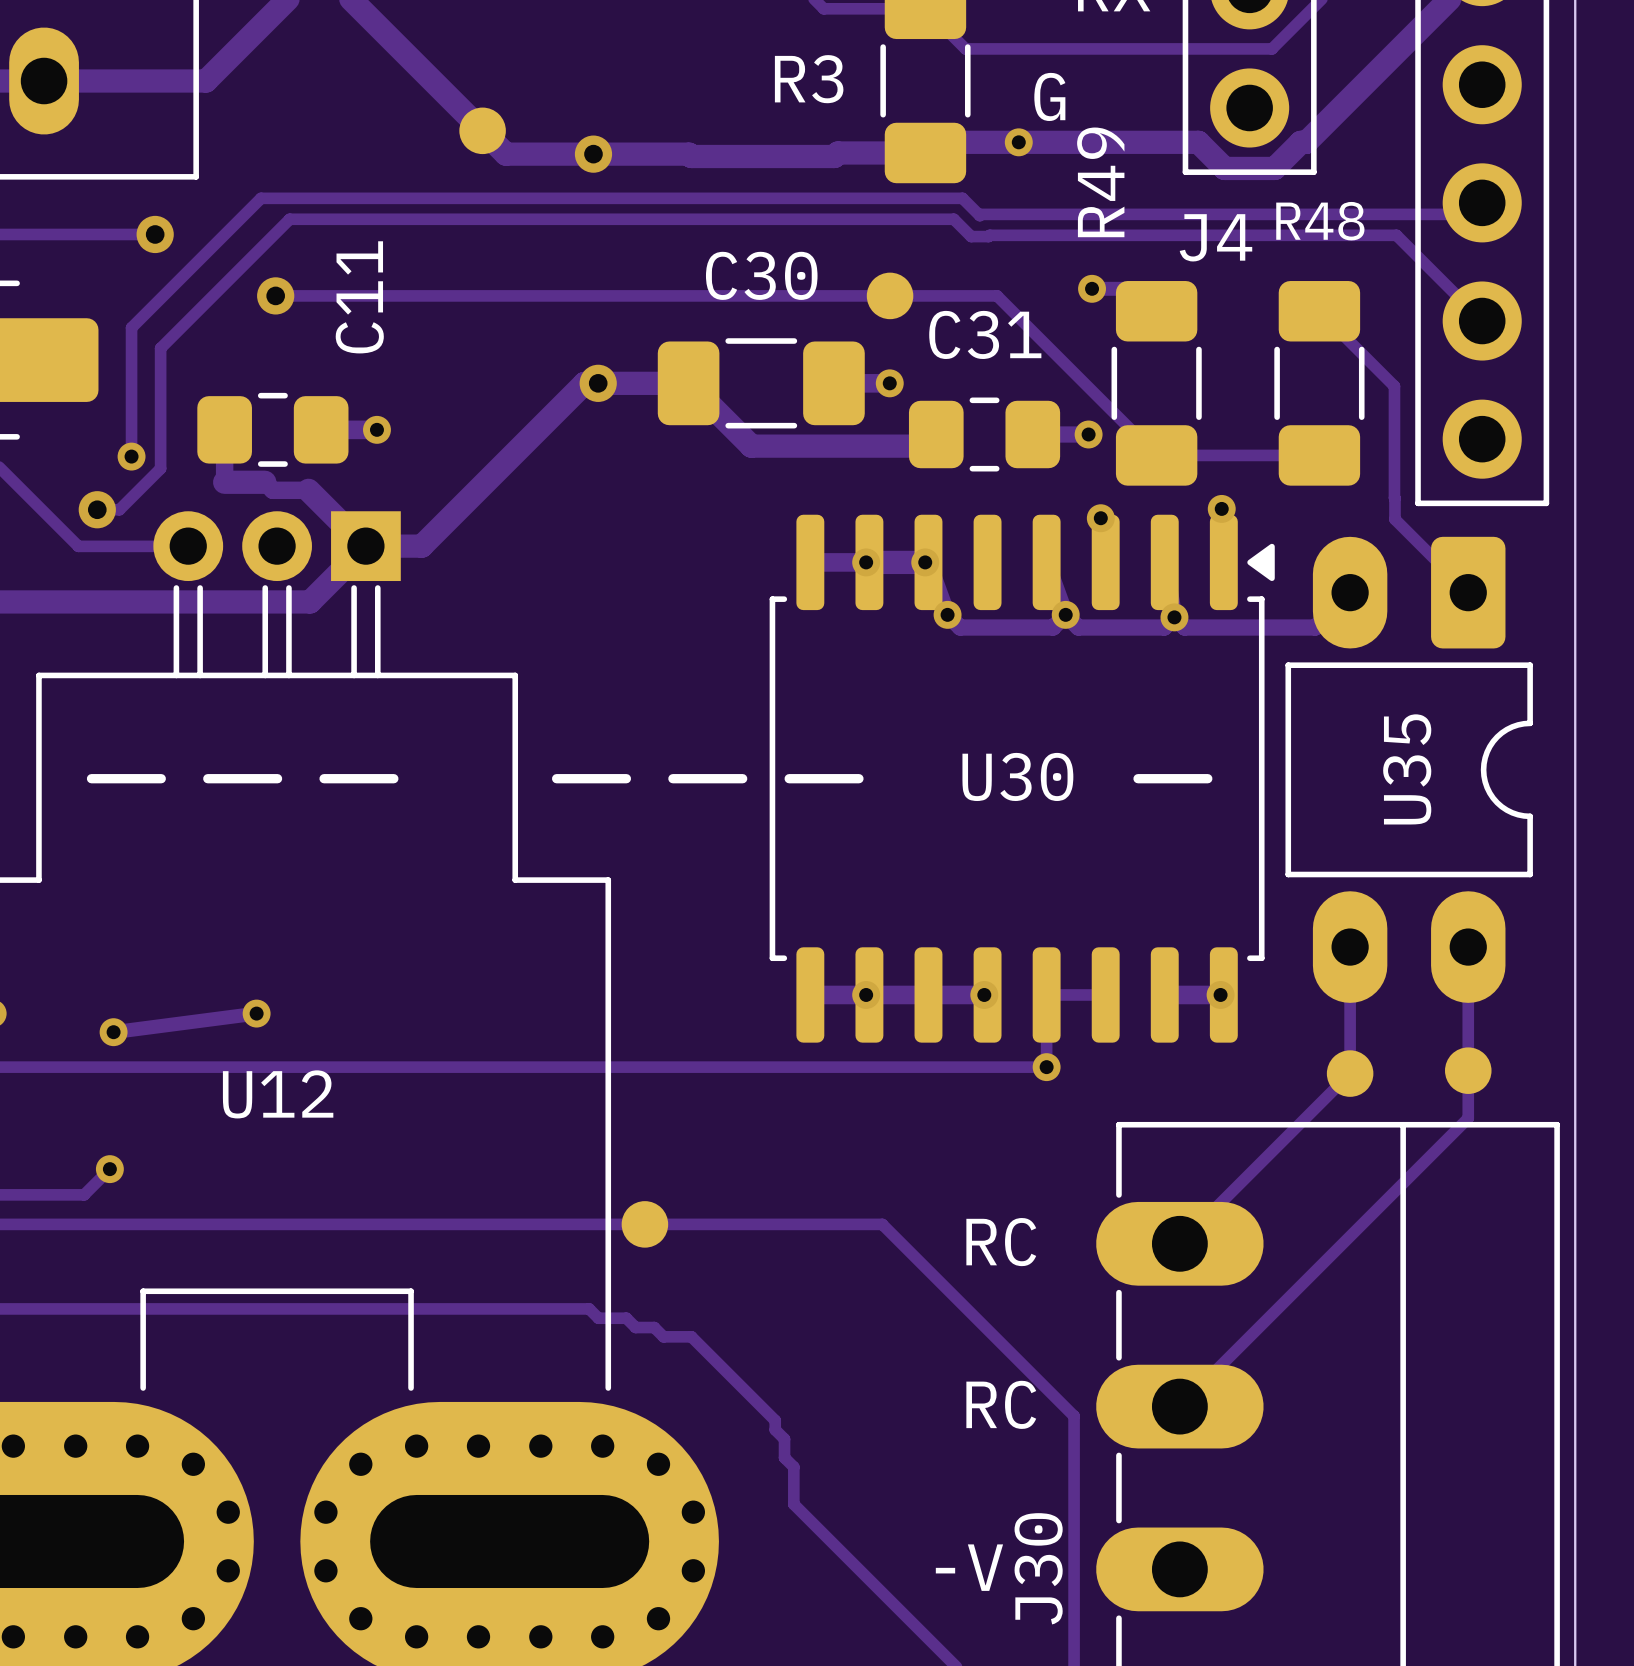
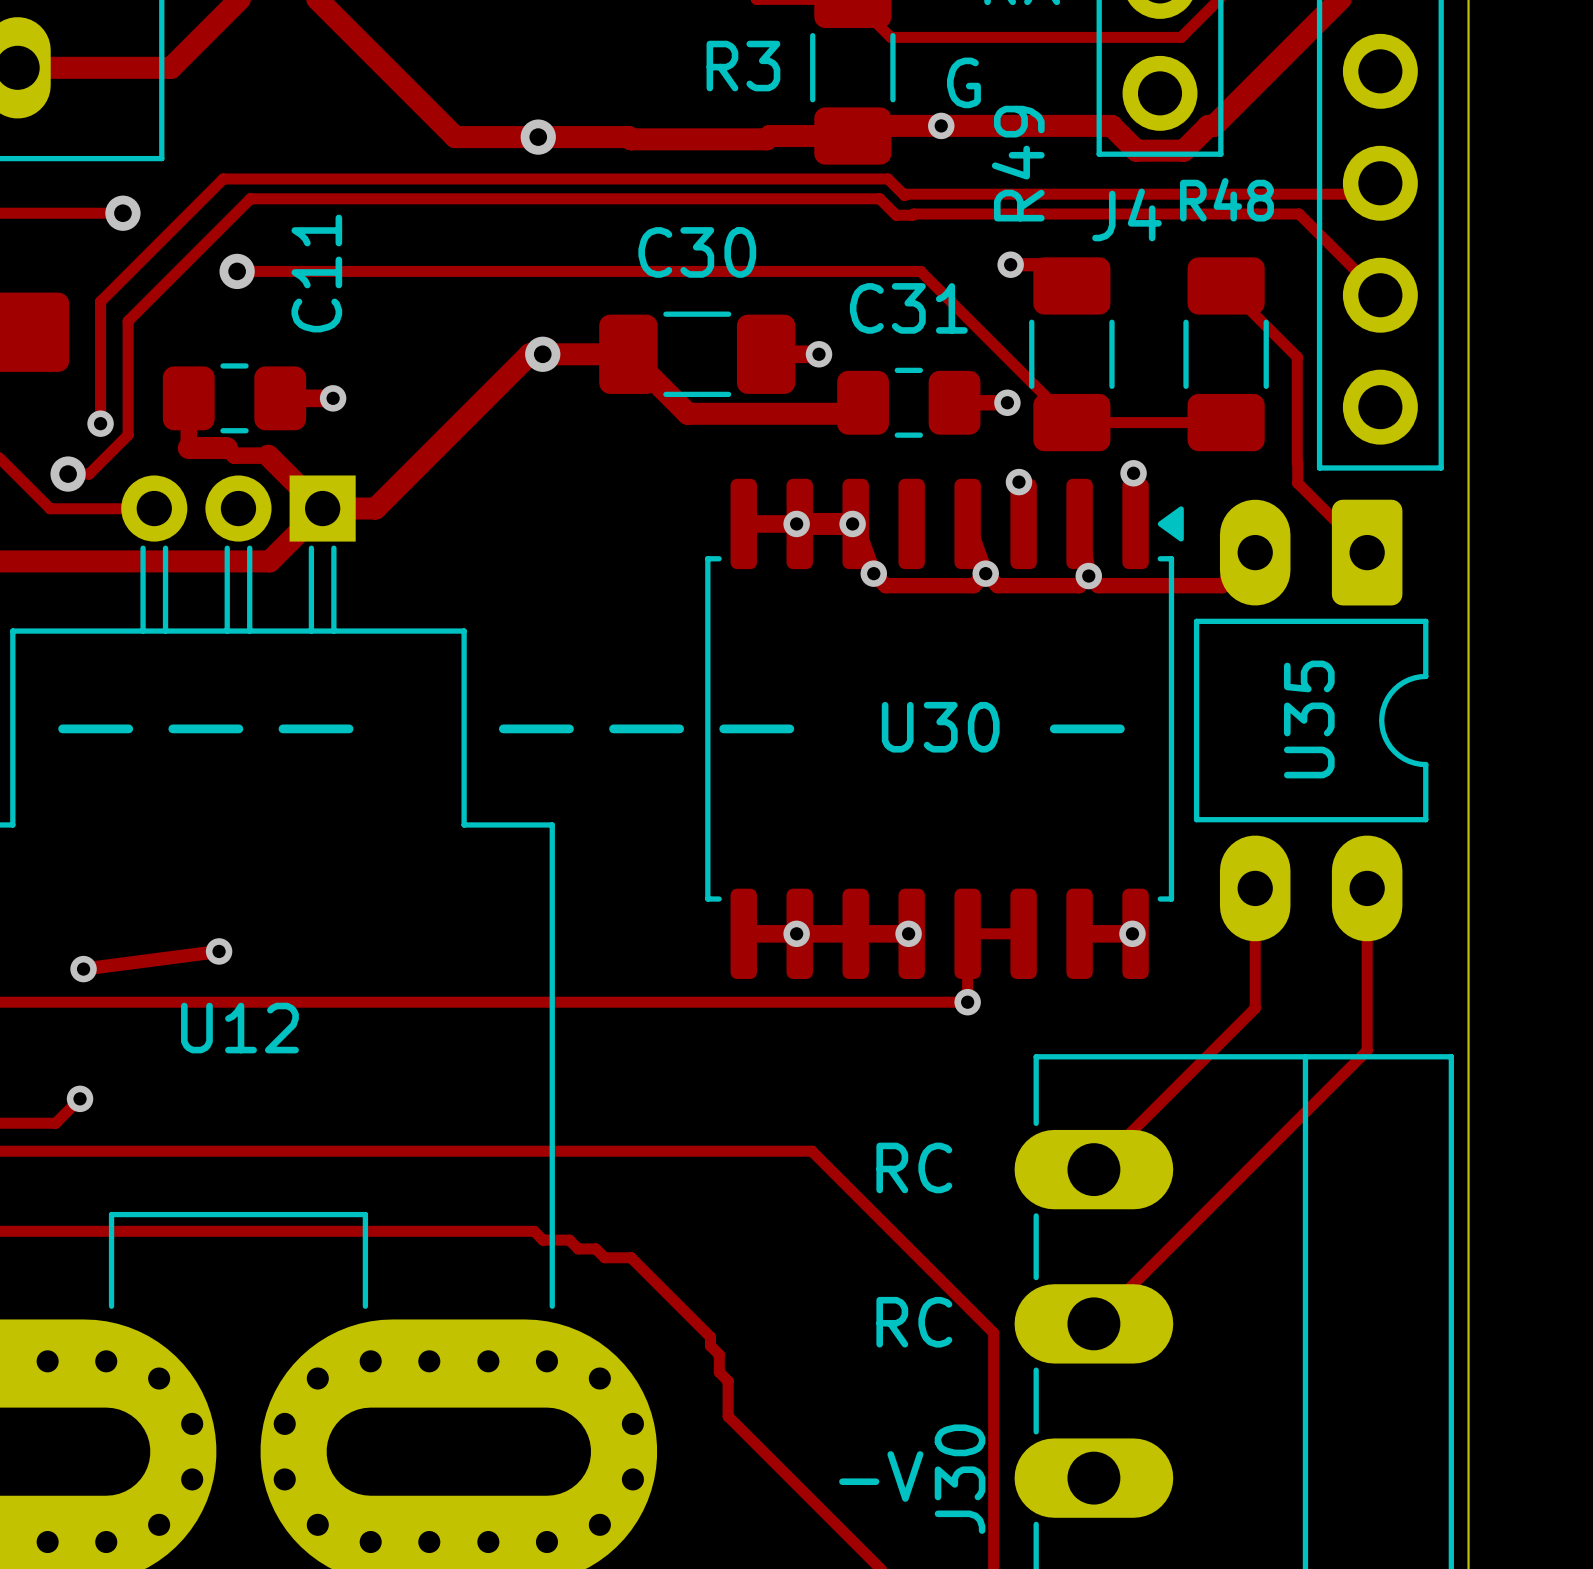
part: (482, 130) -> none
part: (890, 295) -> none
part: (1468, 1070) -> none
part: (1350, 1073) -> none
part: (644, 1224) -> none

